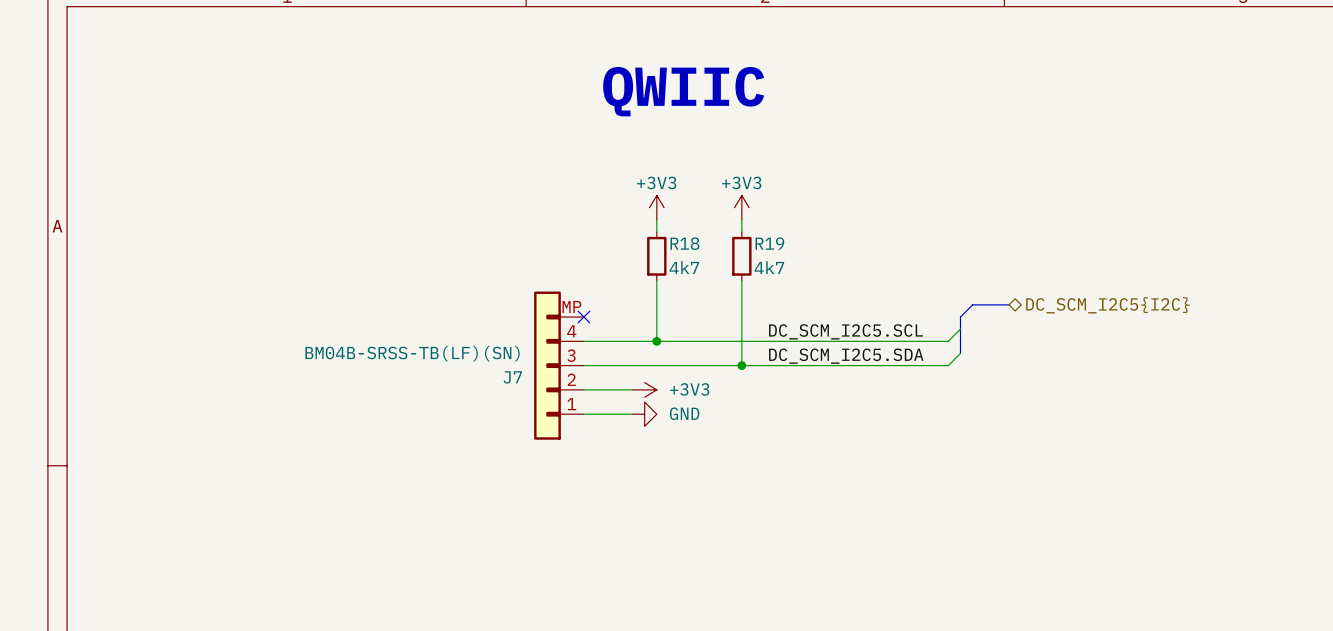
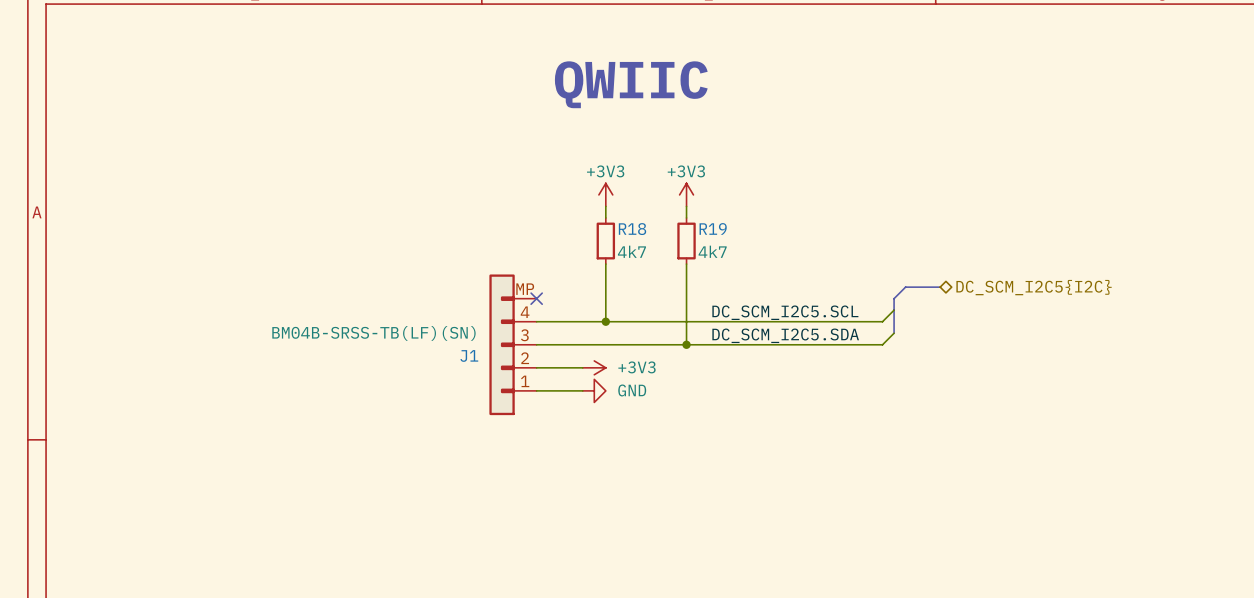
J7 name: J7 (512, 377) -> J1 (469, 355)

